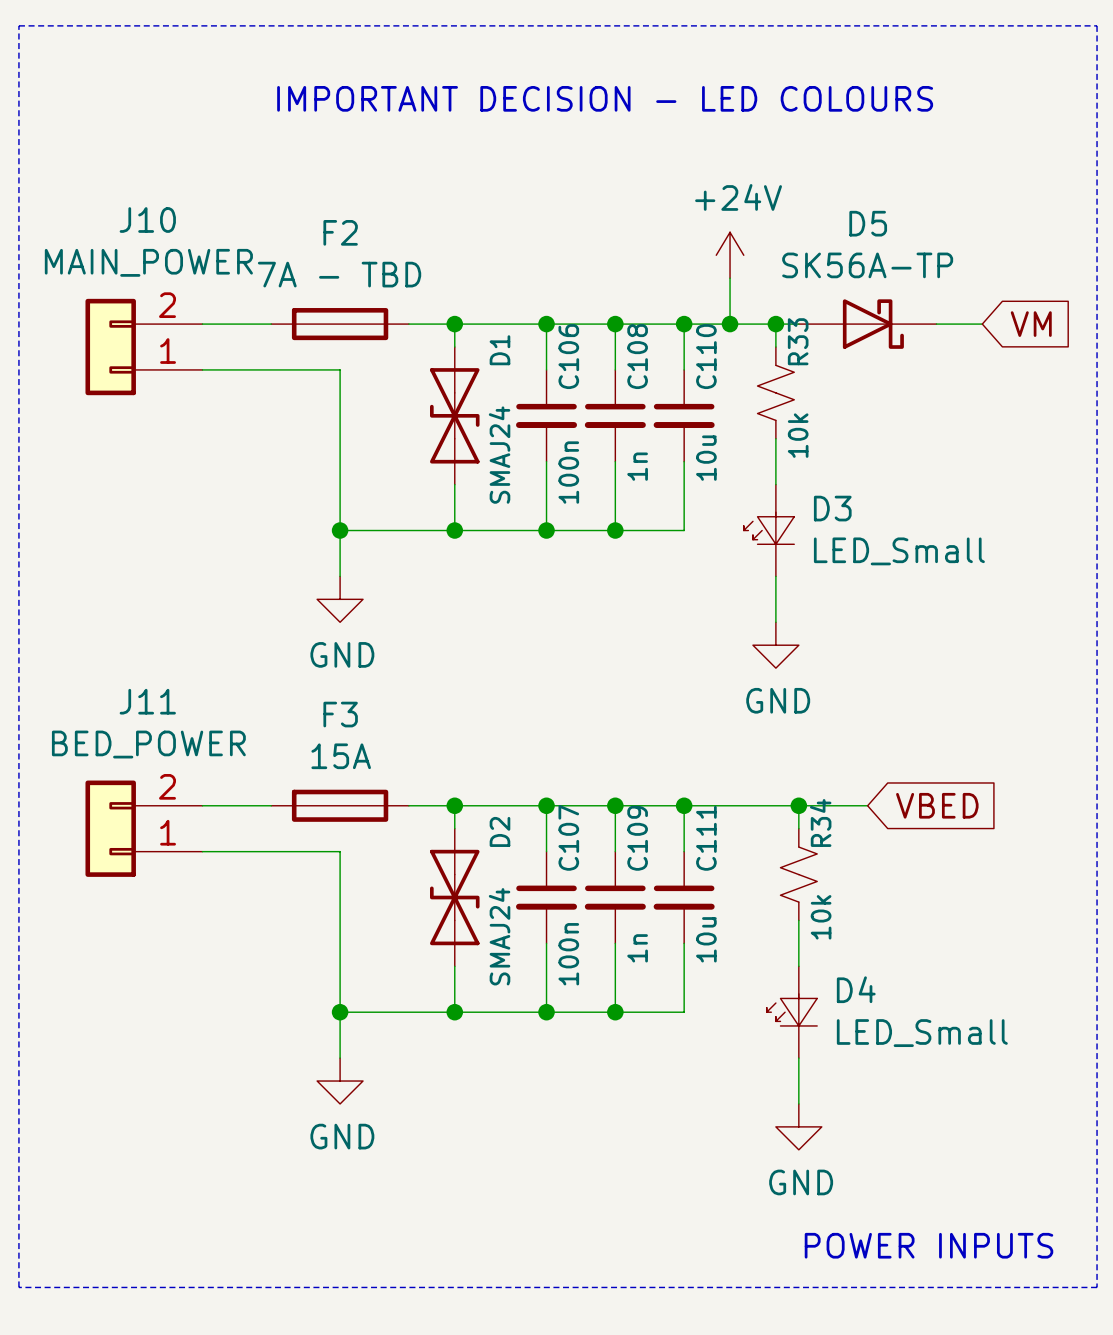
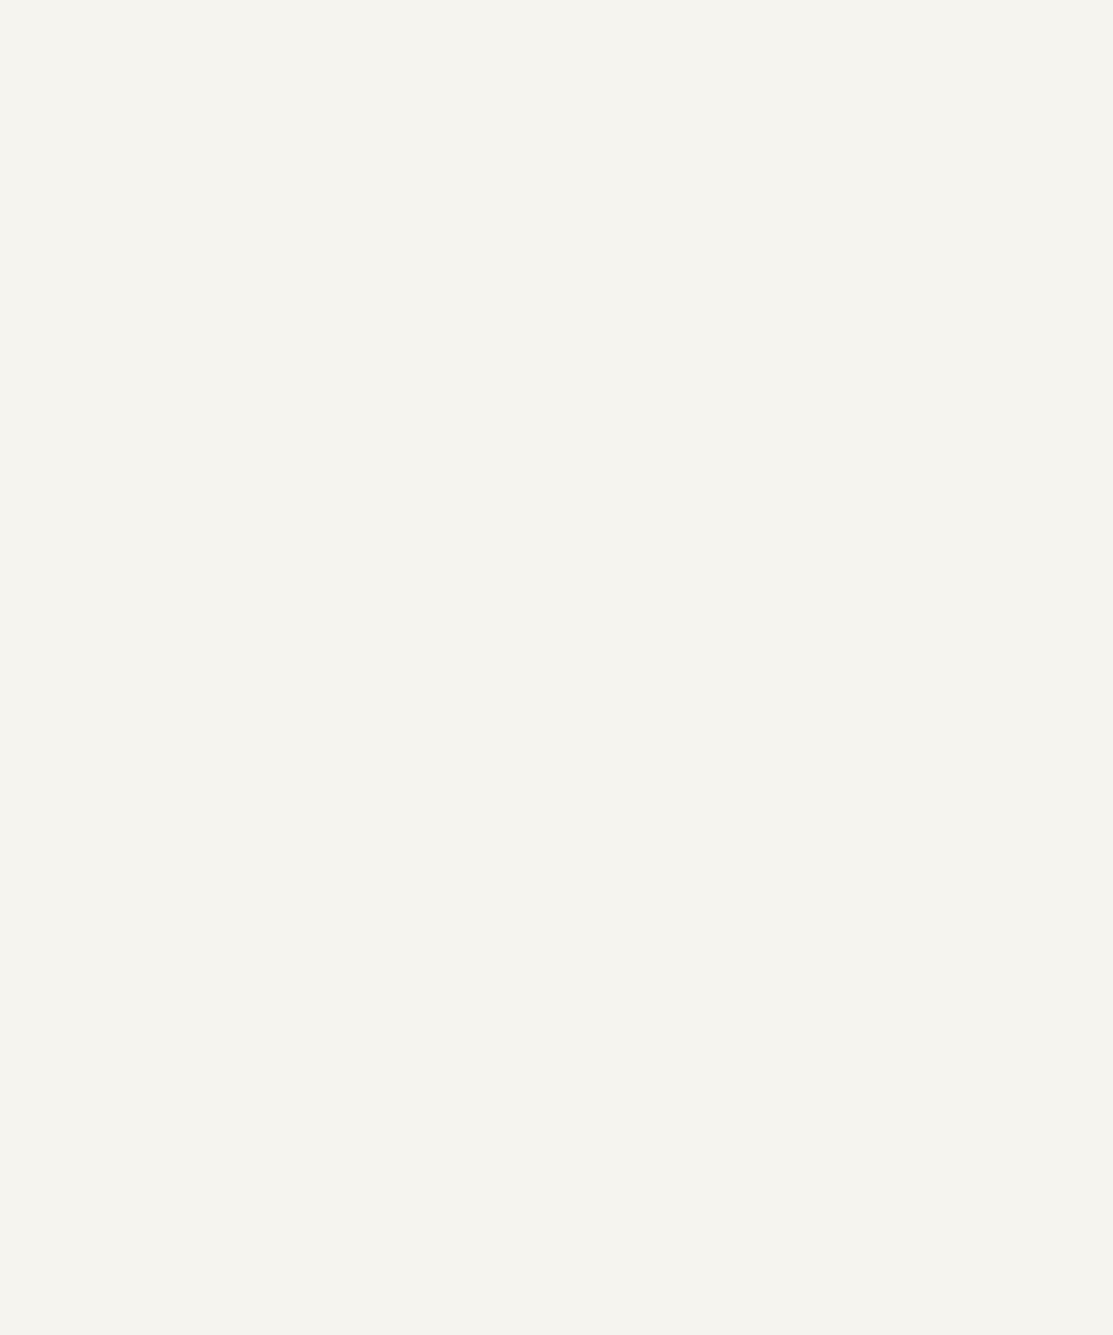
line: (18, 25) (1097, 25) (1097, 1287) (18, 1287) (18, 25) -> none
text: IMPORTANT DECISION - LED COLOURS (605, 98) -> none
power symbol: +24V (730, 255) -> none
wire: (730, 278) (730, 324) -> none
wire: (202, 324) (271, 324) -> none
F2: 7A - TBD (340, 324) -> none
wire: (408, 324) (798, 324) -> none
wire: (454, 324) (454, 347) -> none
junction: (454, 324) -> none
wire: (546, 324) (546, 369) -> none
junction: (546, 324) -> none
wire: (615, 324) (615, 369) -> none
junction: (615, 324) -> none
wire: (684, 324) (684, 369) -> none
junction: (684, 324) -> none
junction: (730, 324) -> none
wire: (775, 324) (775, 347) -> none
junction: (775, 324) -> none
D5: SK56A-TP (867, 324) -> none
wire: (936, 324) (982, 324) -> none
global label: VM (1031, 324) -> none
J10: MAIN_POWER (143, 347) -> none
wire: (202, 369) (340, 369) (340, 576) -> none
R33: 10k (775, 392) -> none
D1: SMAJ24 (454, 415) -> none
C106: 100n (546, 415) -> none
C108: 1n (615, 415) -> none
C110: 10u (684, 415) -> none
wire: (775, 438) (775, 484) -> none
wire: (546, 461) (546, 530) -> none
wire: (615, 461) (615, 530) -> none
wire: (684, 461) (684, 530) (340, 530) -> none
wire: (454, 484) (454, 530) -> none
junction: (340, 530) -> none
junction: (454, 530) -> none
junction: (546, 530) -> none
junction: (615, 530) -> none
D3: LED_Small (769, 530) -> none
wire: (775, 576) (775, 622) -> none
power symbol: GND (340, 599) -> none
power symbol: GND (775, 645) -> none
wire: (202, 805) (271, 805) -> none
F3: 15A (340, 805) -> none
wire: (408, 805) (867, 805) -> none
wire: (454, 805) (454, 828) -> none
junction: (454, 805) -> none
wire: (546, 805) (546, 851) -> none
junction: (546, 805) -> none
wire: (615, 805) (615, 851) -> none
junction: (615, 805) -> none
wire: (684, 805) (684, 851) -> none
junction: (684, 805) -> none
wire: (798, 805) (798, 828) -> none
junction: (798, 805) -> none
global label: VBED (937, 805) -> none
J11: BED_POWER (143, 828) -> none
wire: (202, 851) (340, 851) (340, 1058) -> none
R34: 10k (798, 874) -> none
D2: SMAJ24 (454, 897) -> none
C107: 100n (546, 897) -> none
C109: 1n (615, 897) -> none
C111: 10u (684, 897) -> none
wire: (798, 920) (798, 966) -> none
wire: (546, 943) (546, 1012) -> none
wire: (615, 943) (615, 1012) -> none
wire: (684, 943) (684, 1012) (340, 1012) -> none
wire: (454, 966) (454, 1012) -> none
junction: (340, 1012) -> none
junction: (454, 1012) -> none
junction: (546, 1012) -> none
junction: (615, 1012) -> none
D4: LED_Small (791, 1012) -> none
wire: (798, 1058) (798, 1103) -> none
power symbol: GND (340, 1081) -> none
power symbol: GND (798, 1126) -> none
text: POWER INPUTS (928, 1245) -> none

